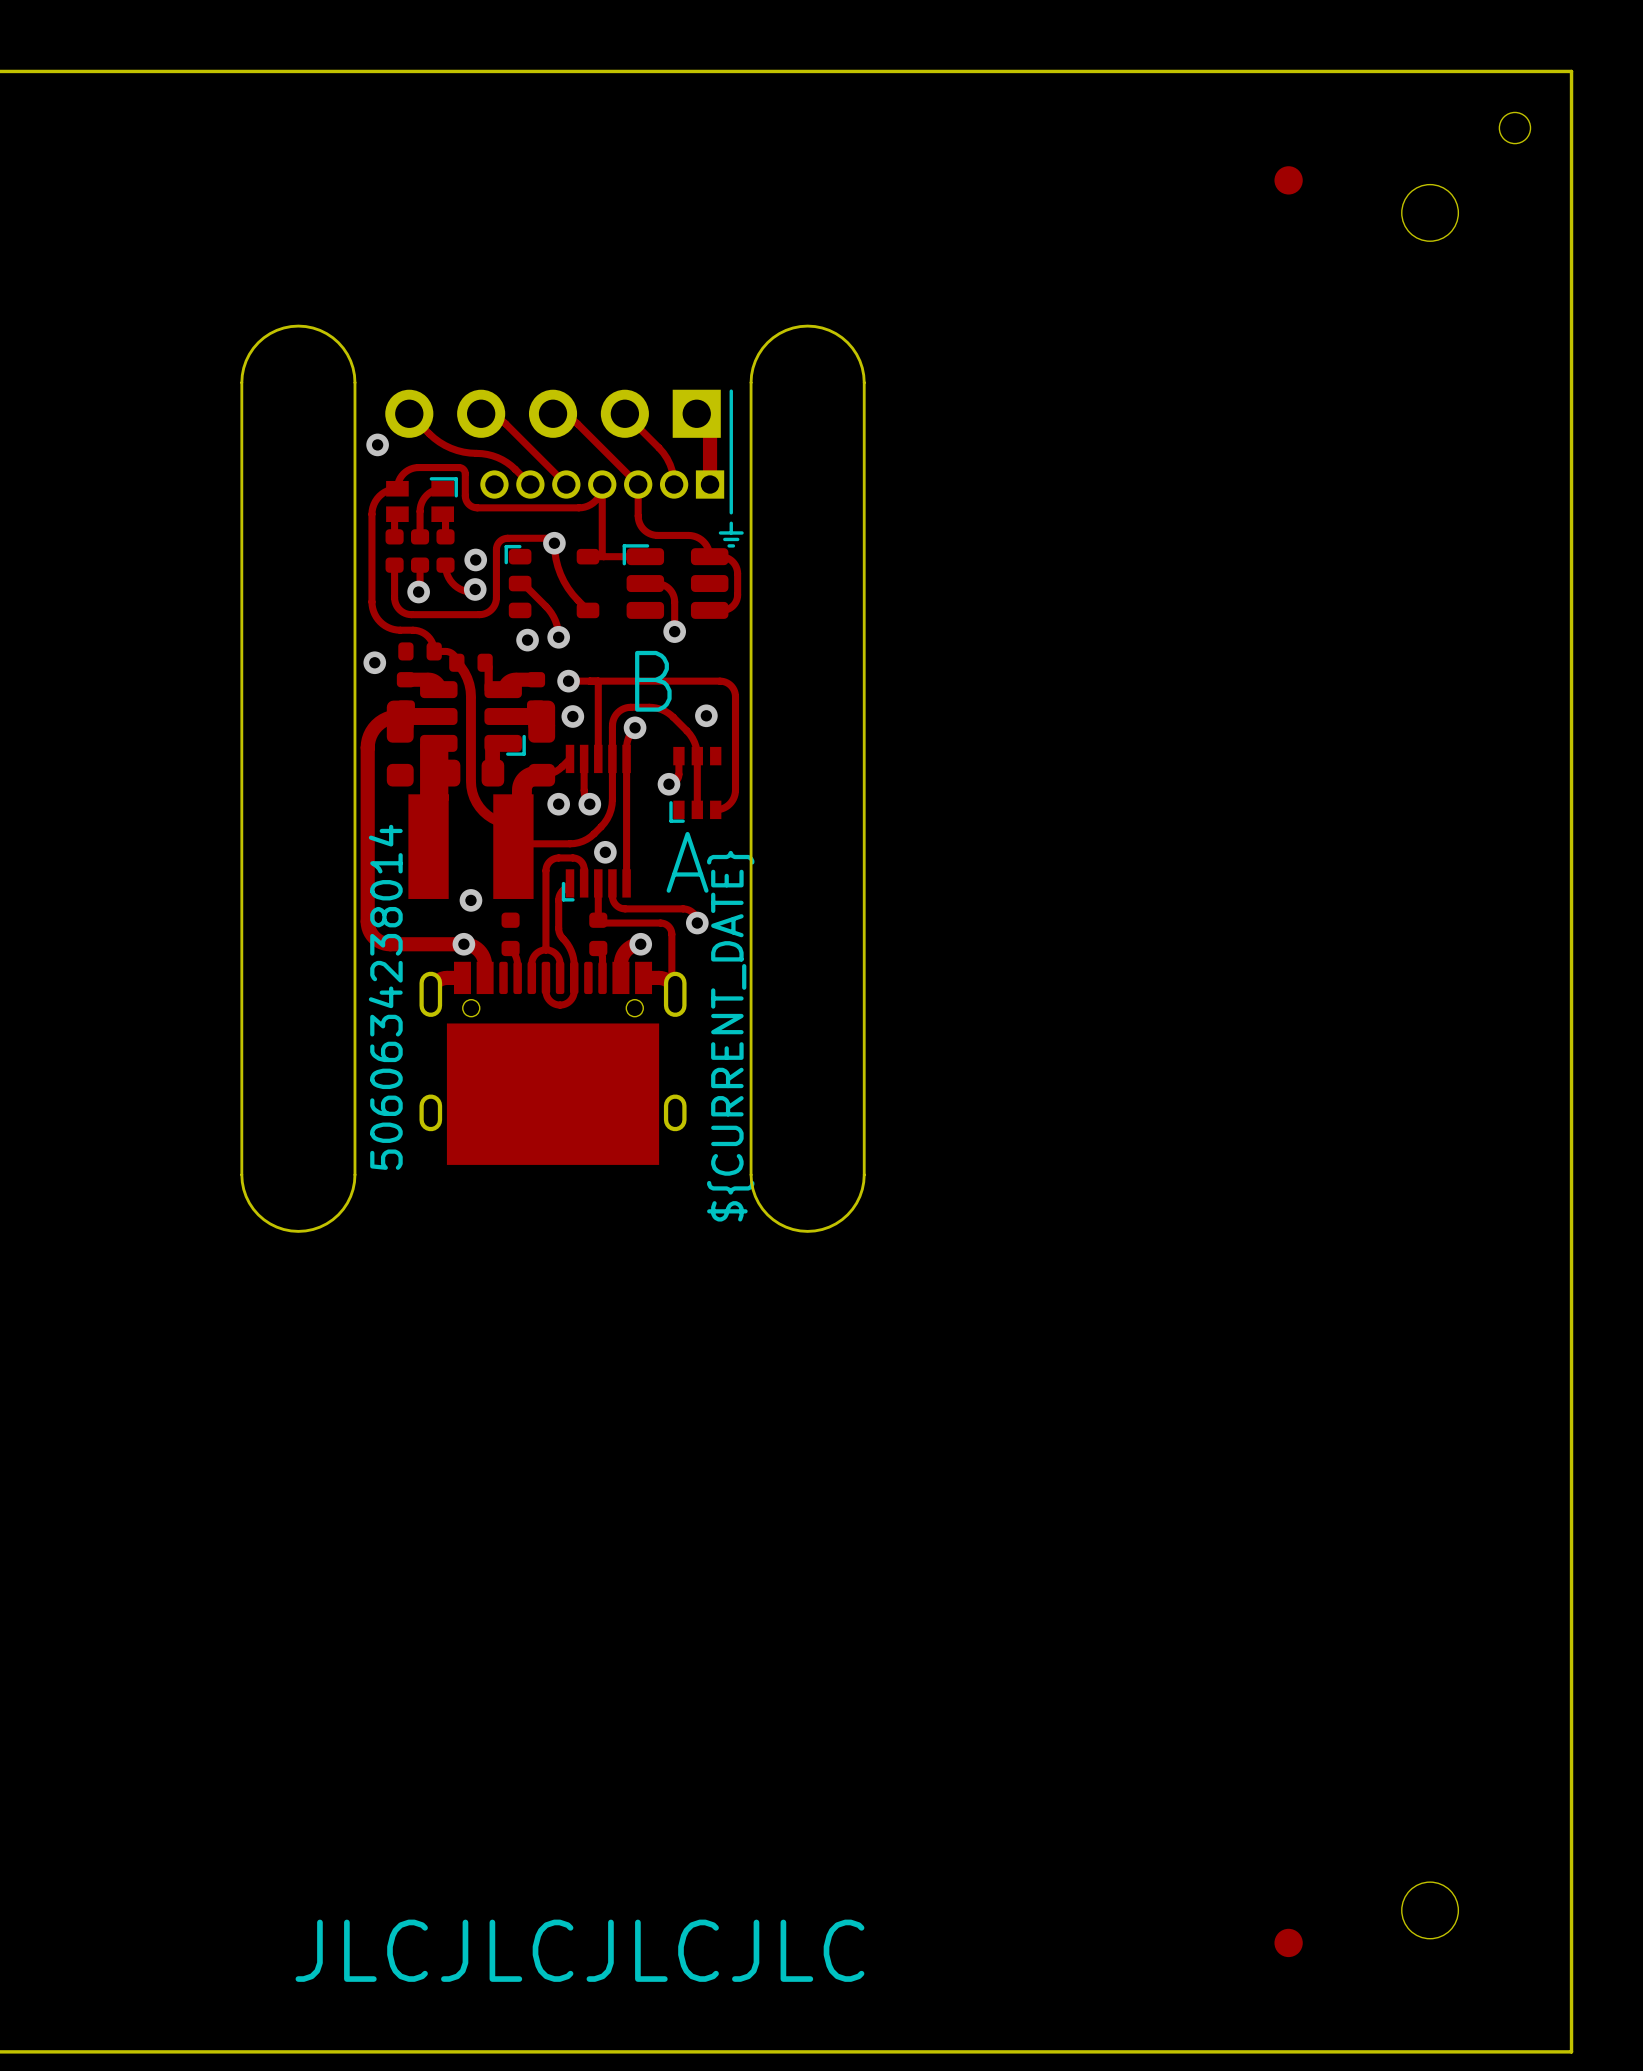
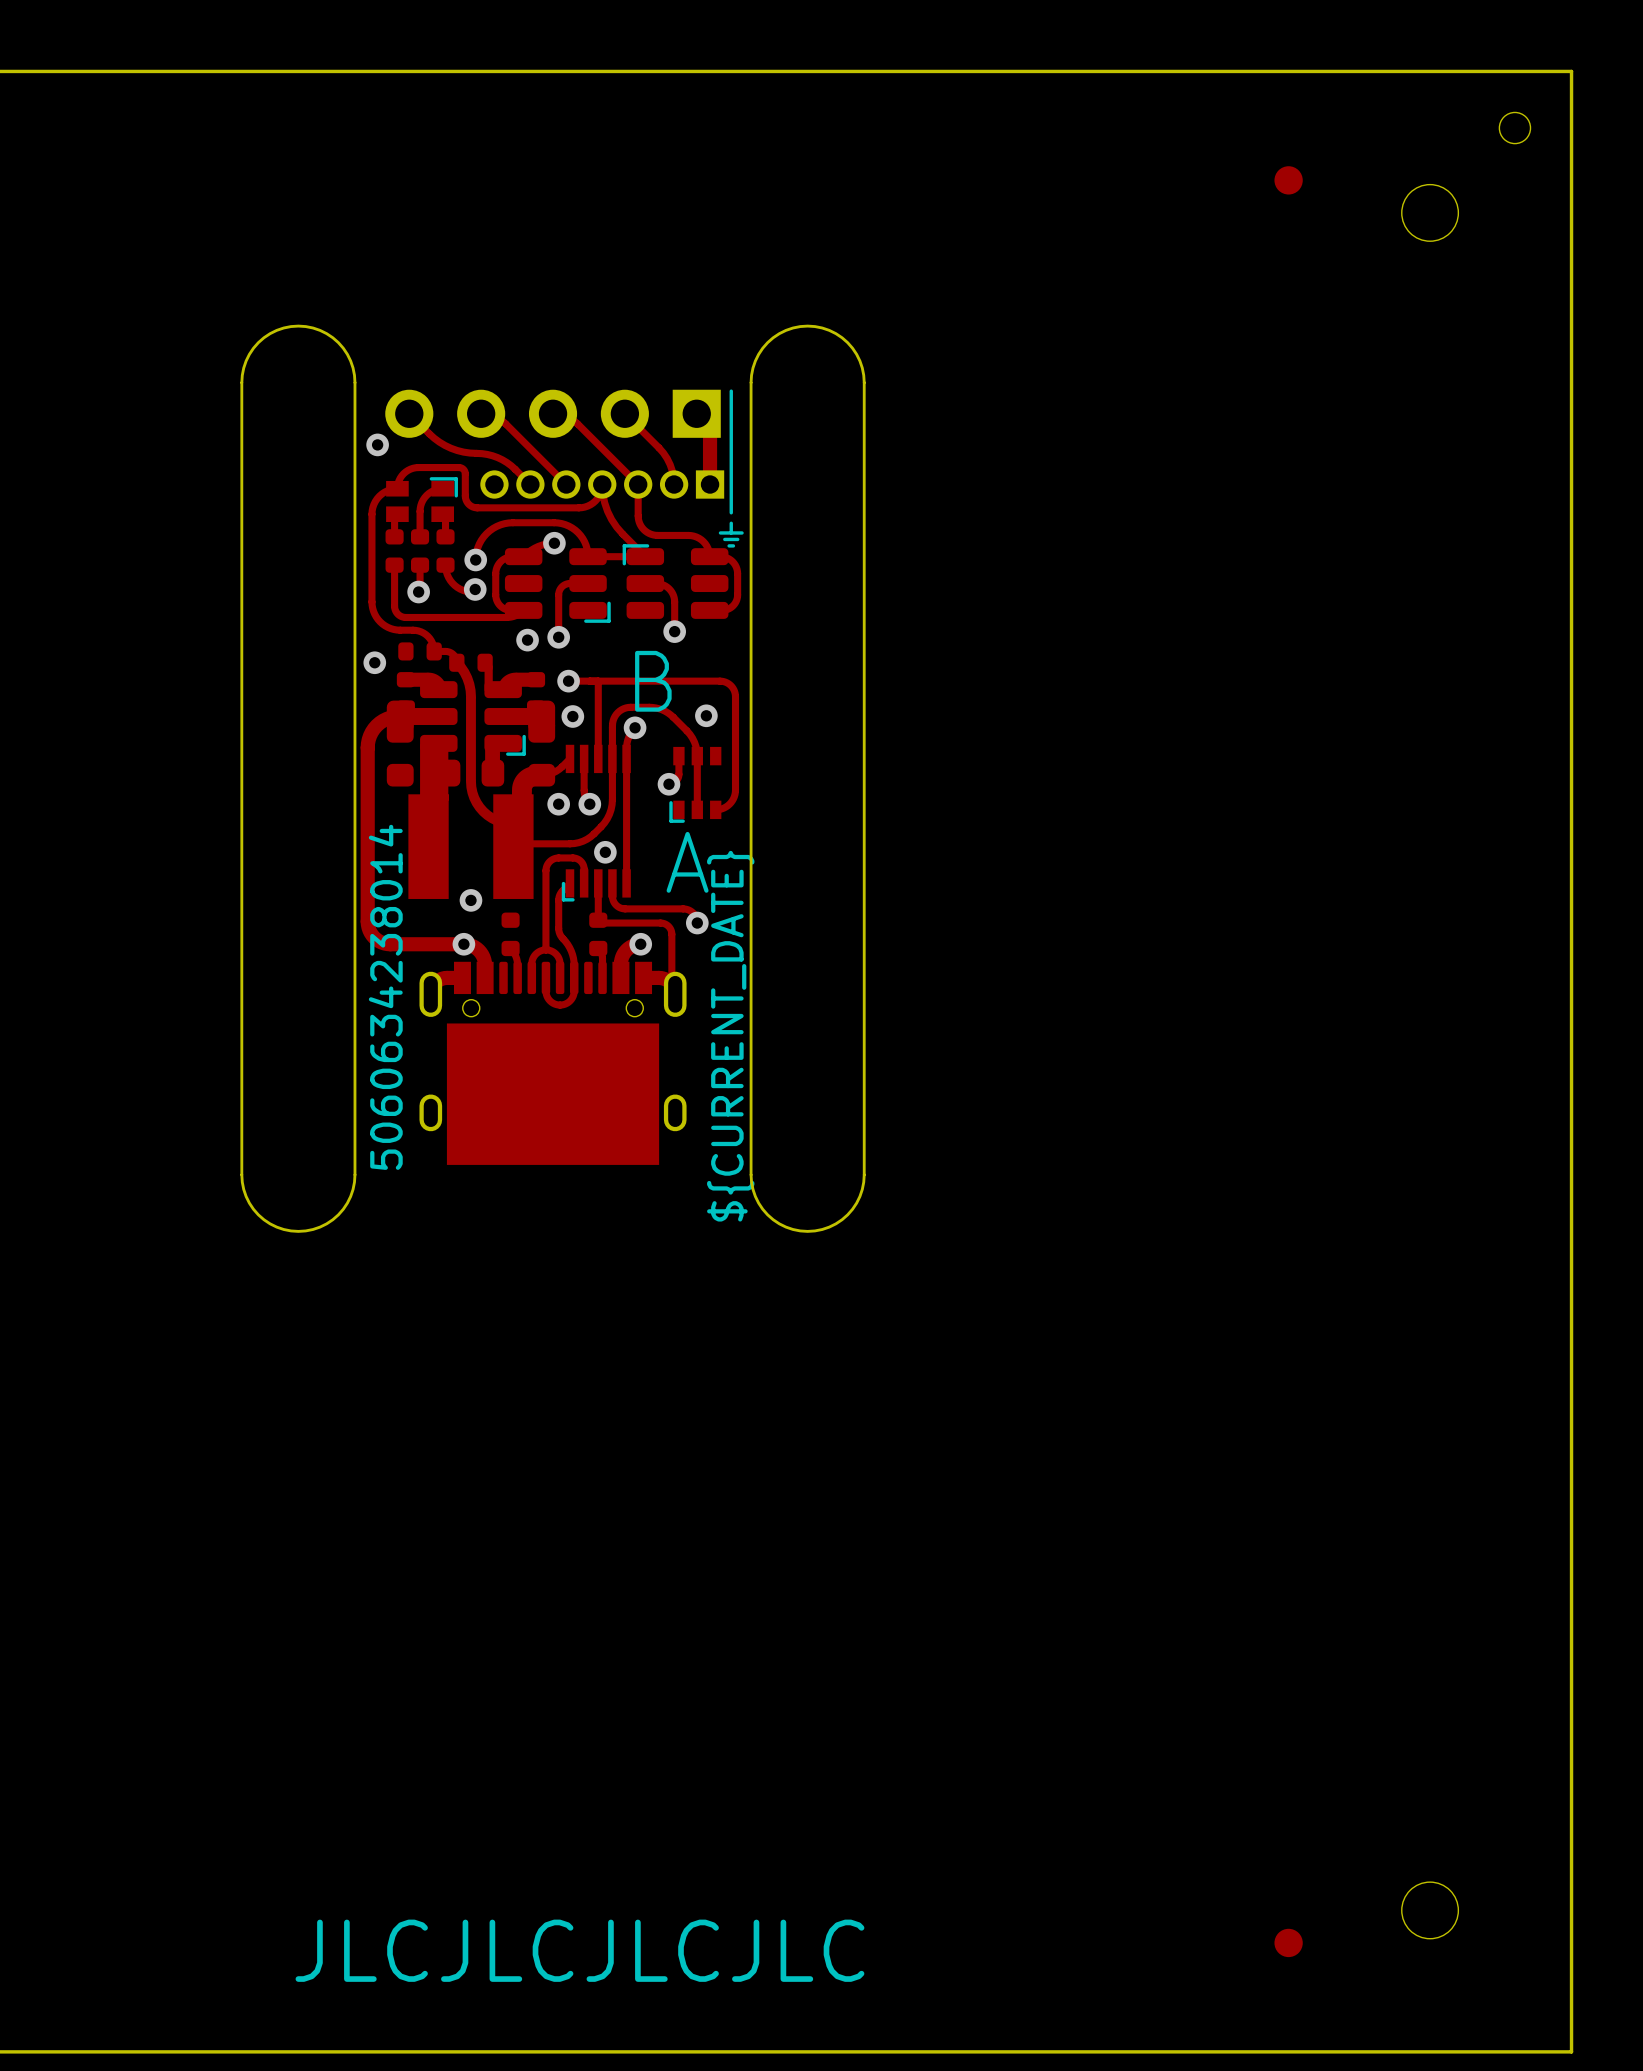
track: (602, 484) (602, 554) (603, 556) -> (602, 484) (604, 502) (611, 519) (622, 534) (645, 556)
part footprint: [504, 544, 600, 619] -> [504, 548, 611, 623]
track: none -> (588, 556) (582, 538) (568, 526) (557, 522) (512, 522) (496, 526) (486, 533) (479, 543) (475, 559)
track: (520, 583) (523, 583) (551, 612) (556, 624) (558, 637) -> (588, 583) (567, 583) (559, 589) (558, 637)
track: (394, 597) (399, 609) (409, 614) (485, 613) (492, 608) (496, 599) (496, 549) (498, 542) (506, 538) (550, 538) (554, 541) (555, 559) (563, 581) (572, 594) (588, 610) -> (394, 597) (395, 611) (404, 617) (513, 616) (523, 610) (506, 609) (500, 605) (496, 599) (495, 573) (498, 565) (506, 557) (523, 556) (538, 546) (554, 543)

